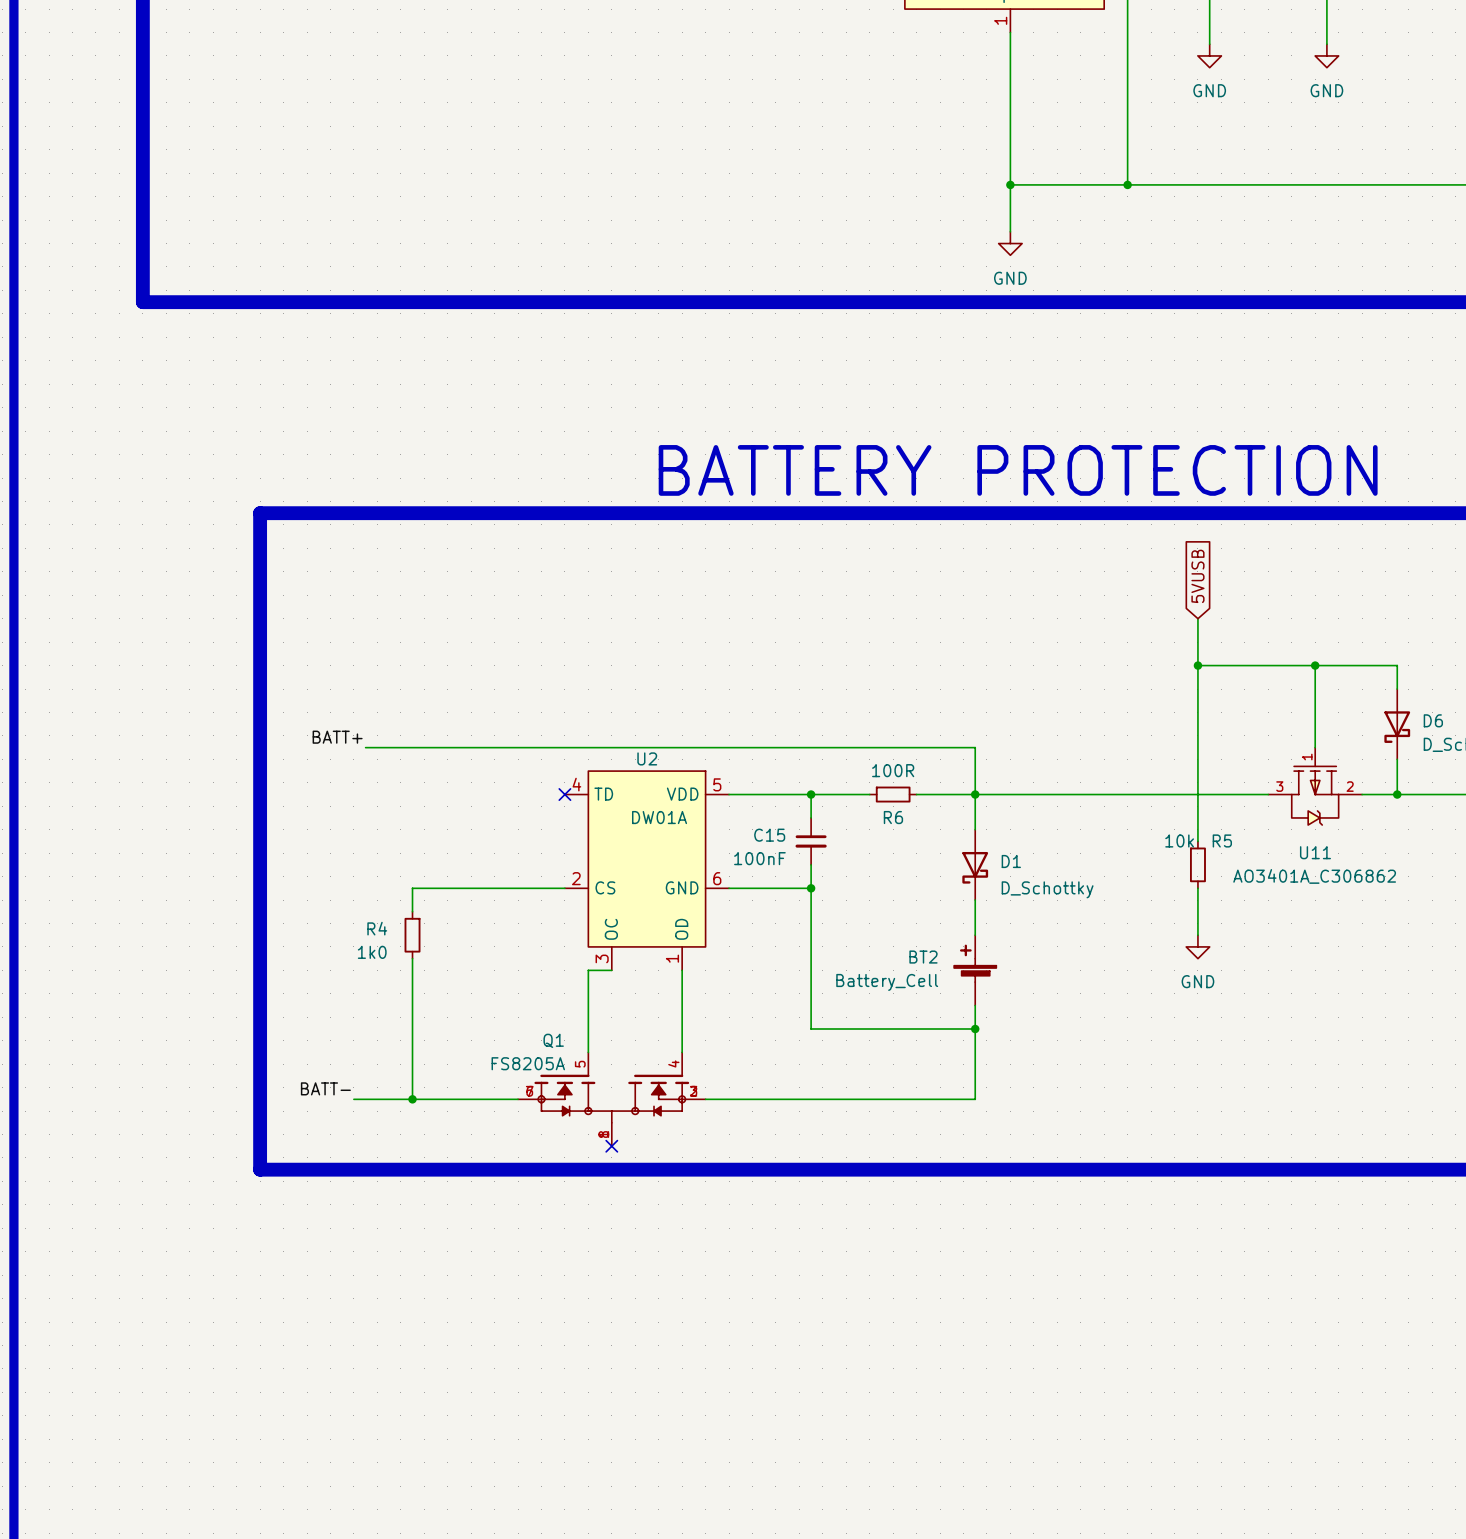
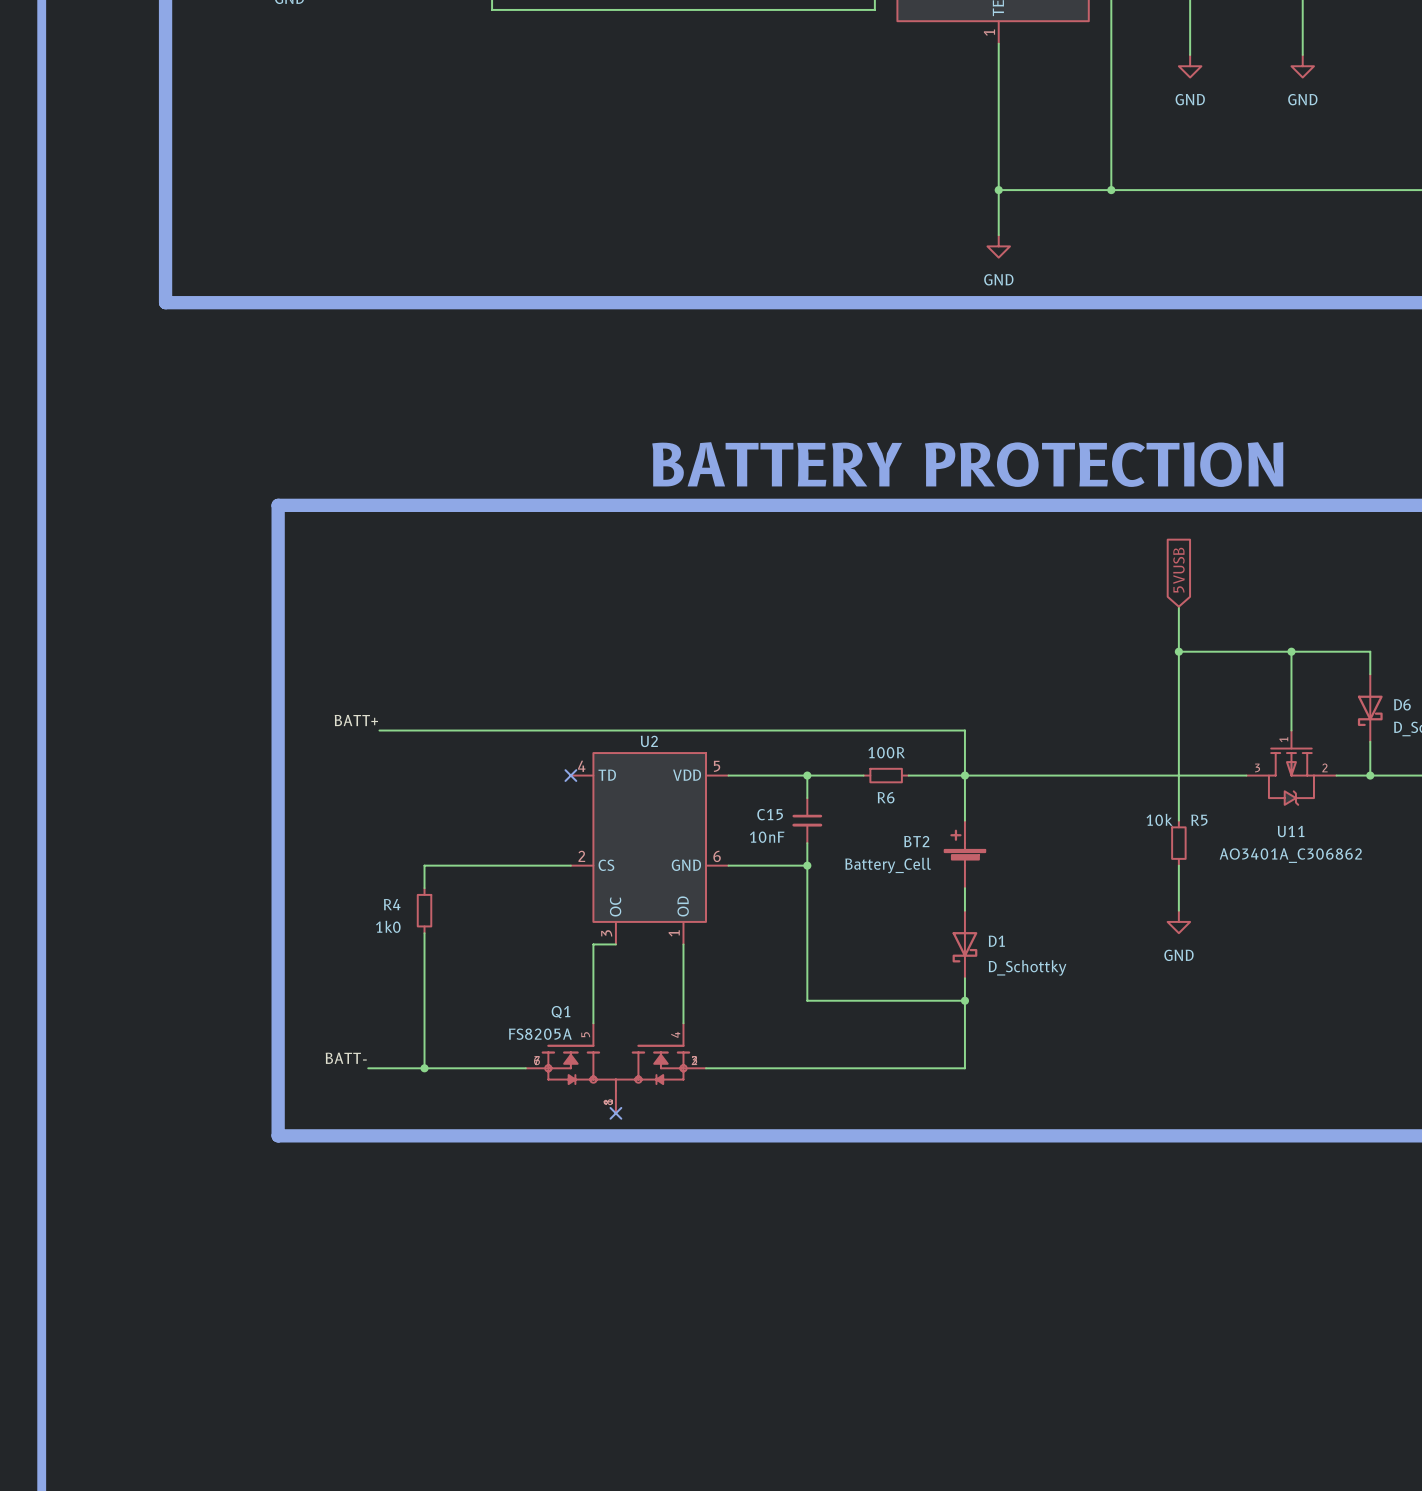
U2 value: DW01A (659, 817) -> none
C15 value: 100nF (759, 858) -> 10nF (767, 837)
D1 position: (975, 864) -> (964, 944)
BT2 position: (975, 970) -> (964, 854)

